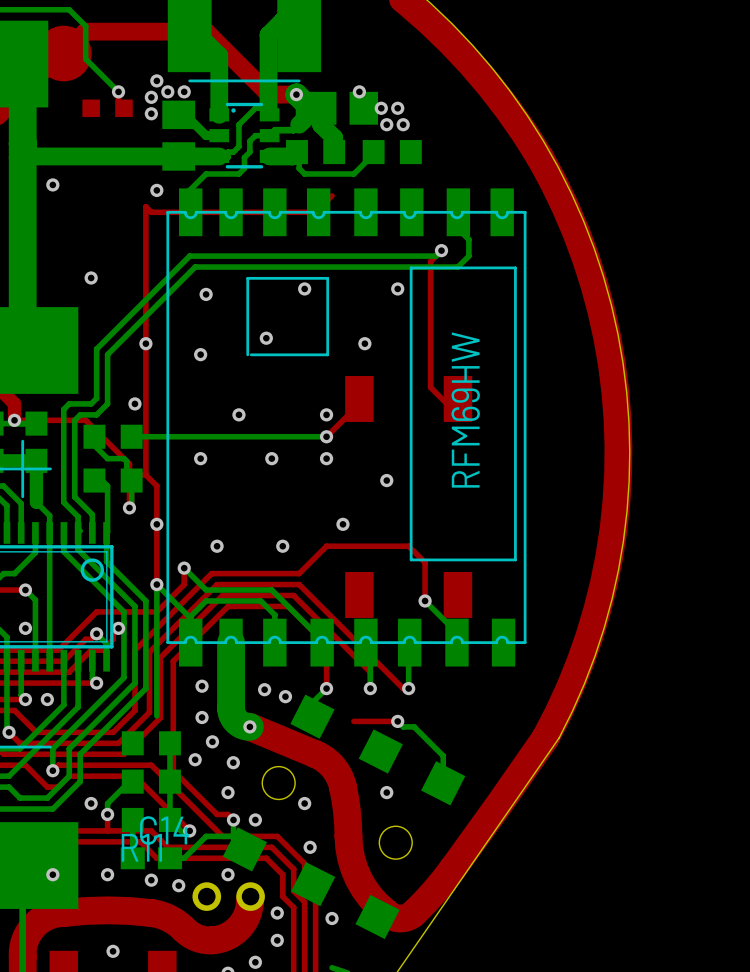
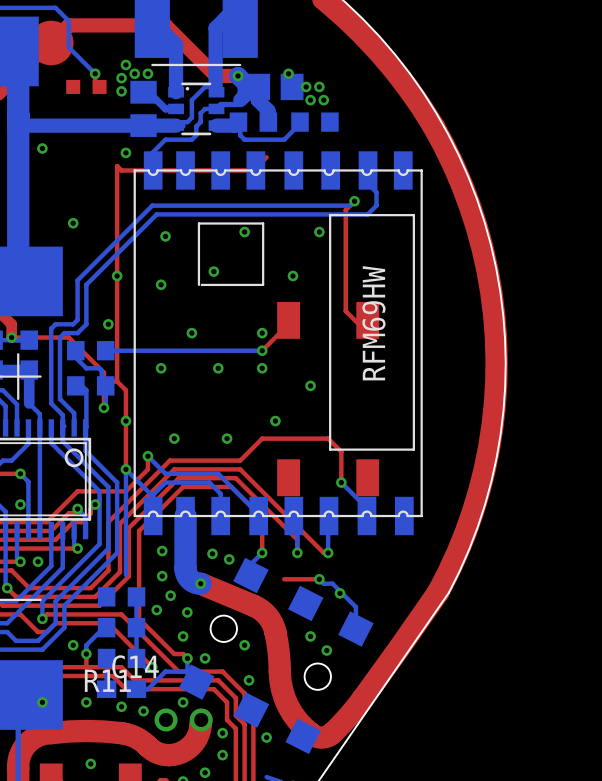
via: none -> (339, 593)
via: none -> (326, 650)

